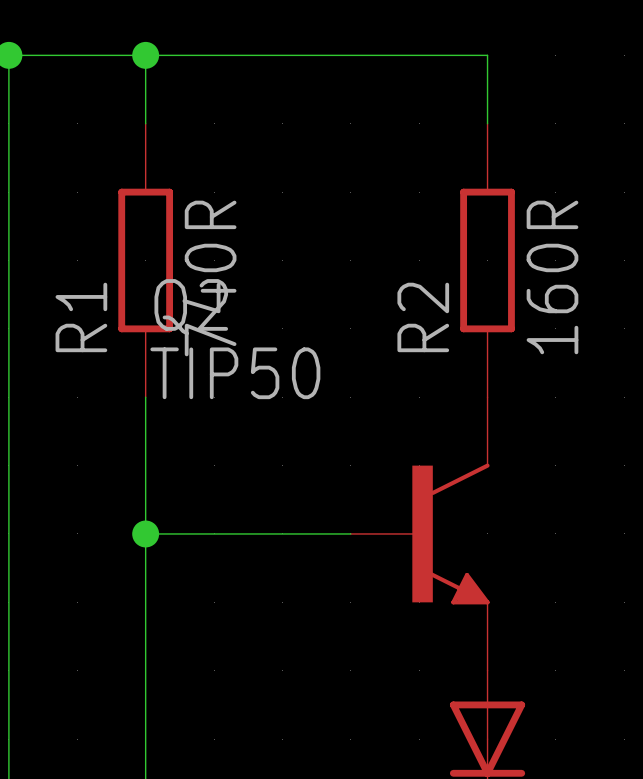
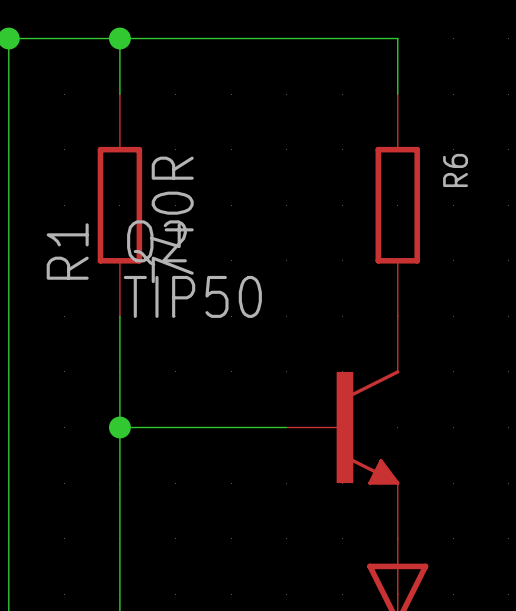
R2 value: 160R (552, 277) -> none
R2 name: R2 (423, 317) -> R6 (455, 170)

